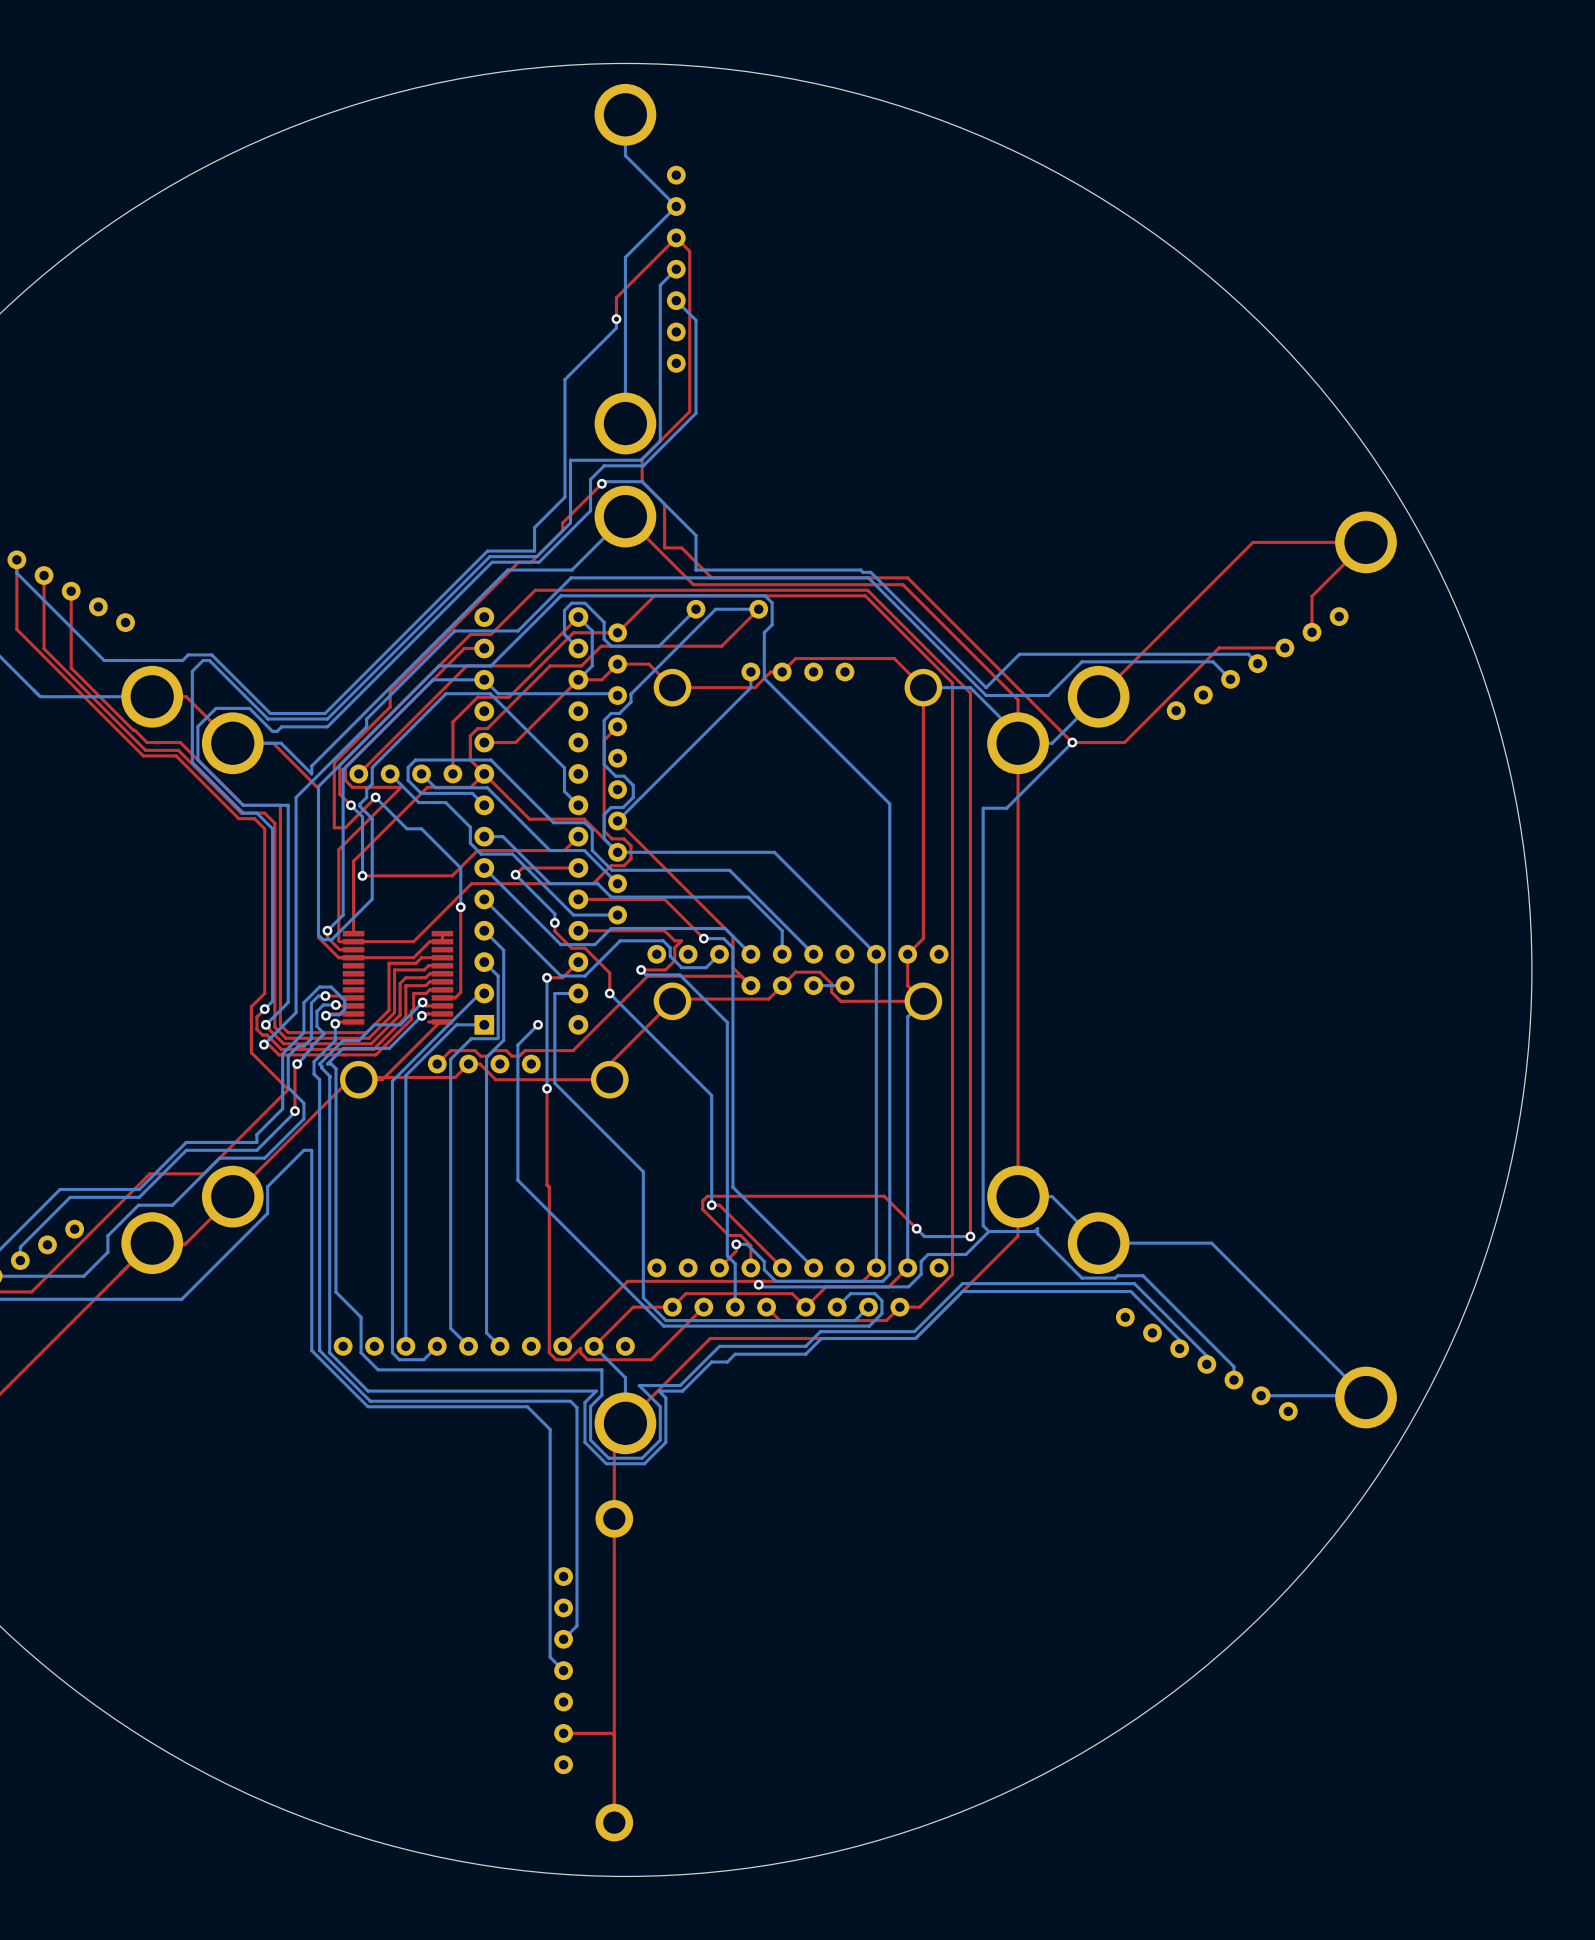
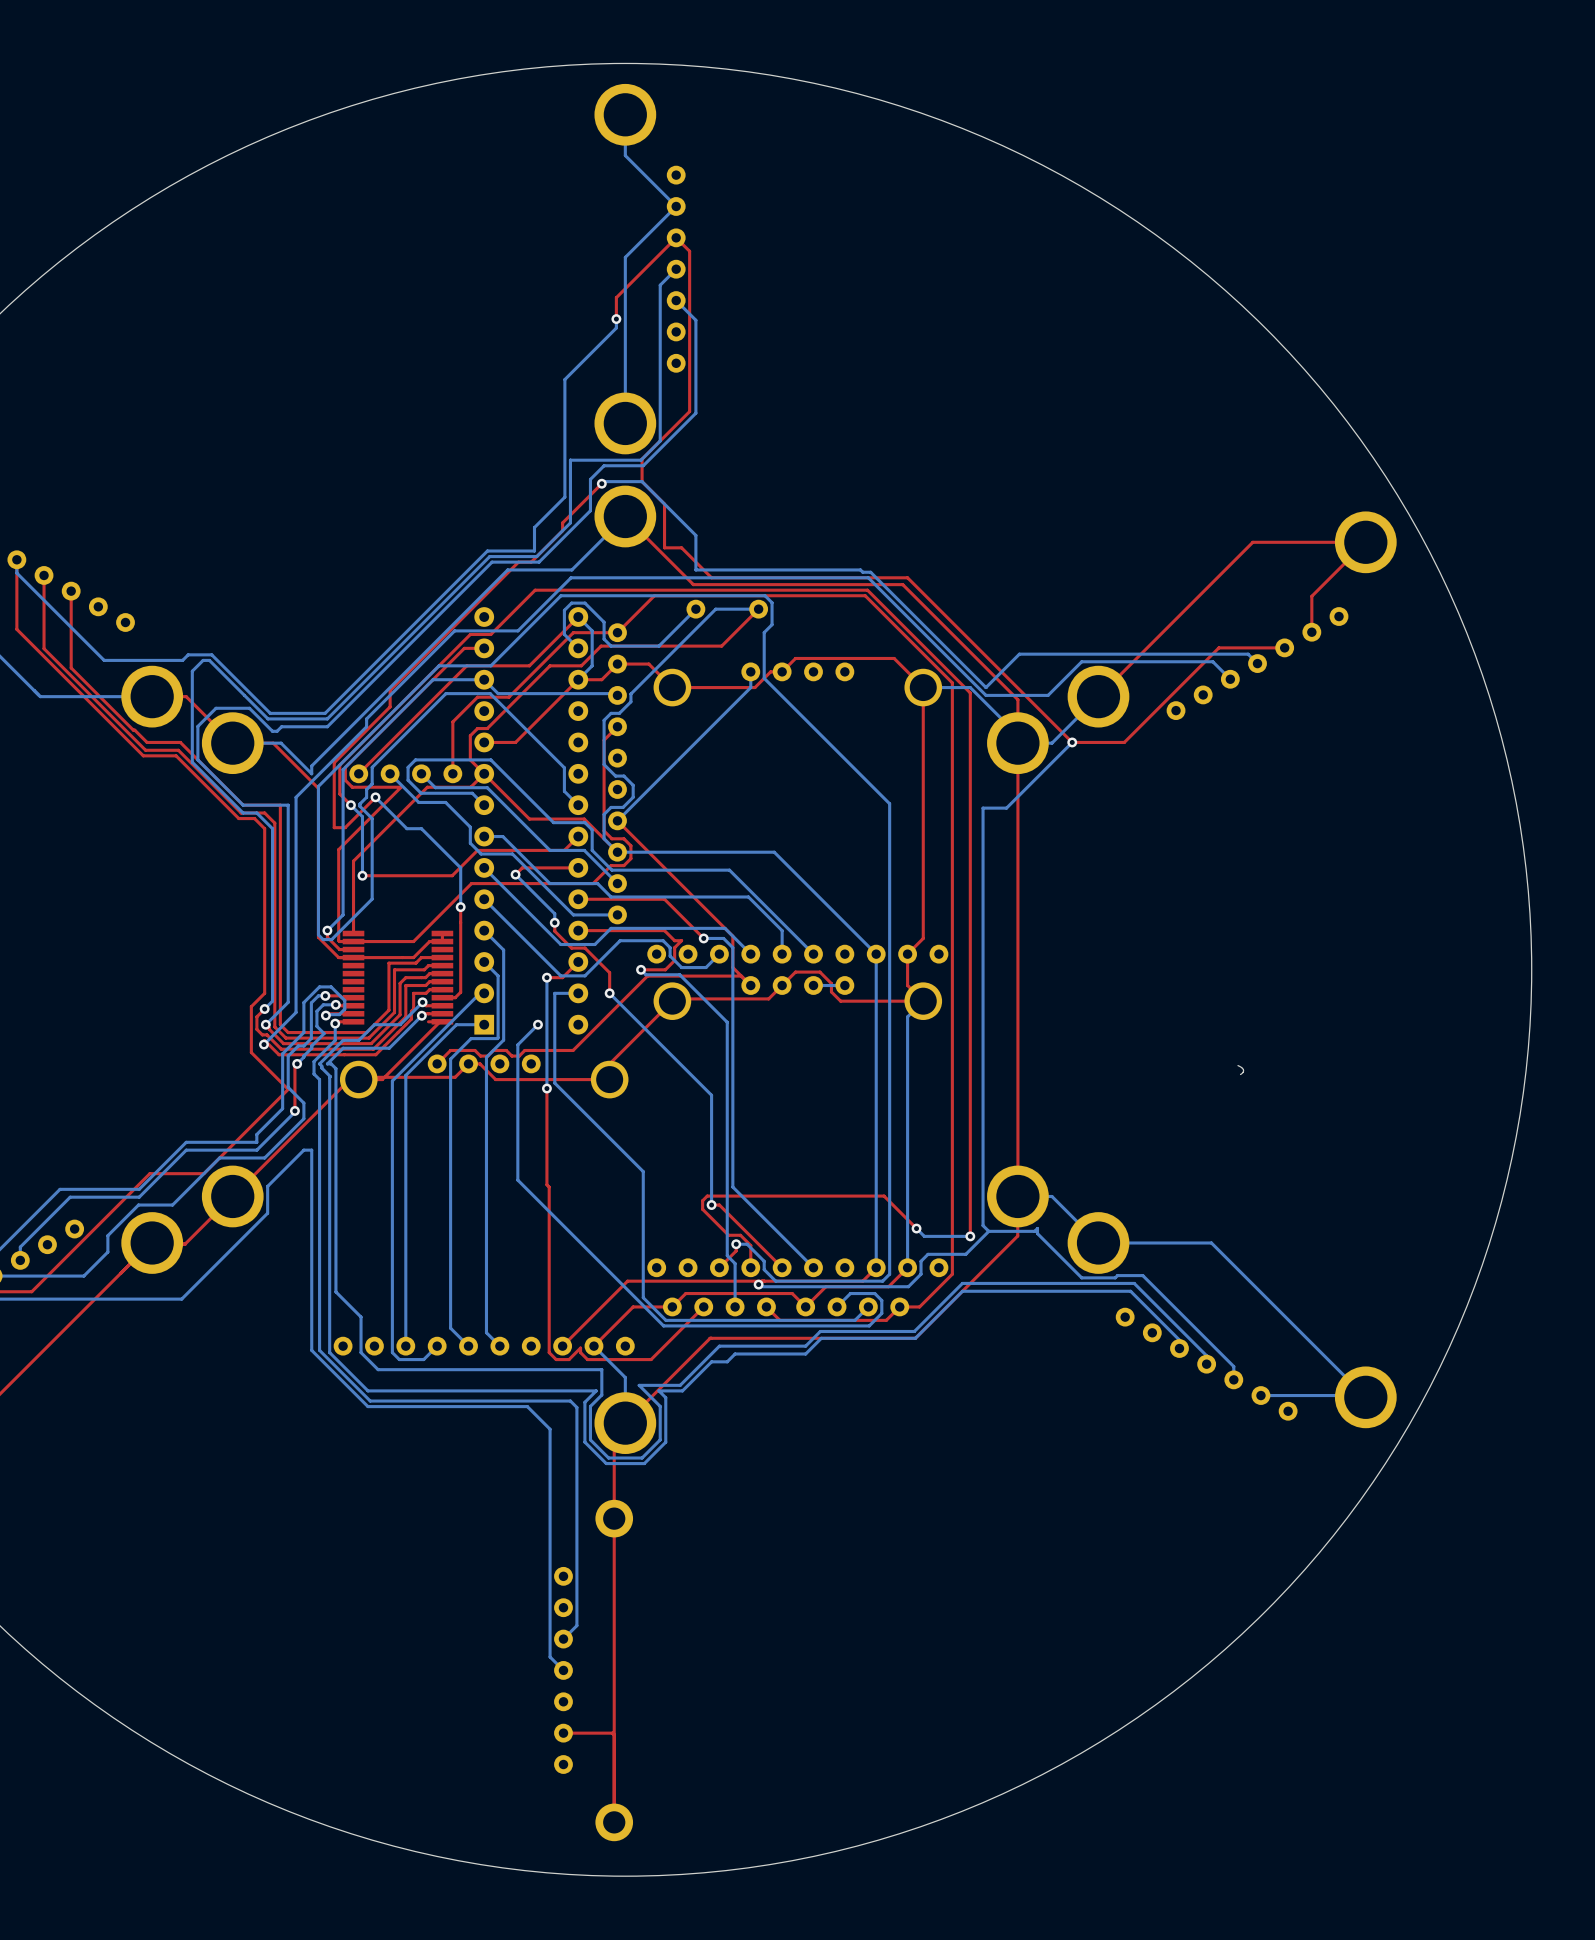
board edge: none -> (1237, 1065) (1243, 1069) (1240, 1074)

